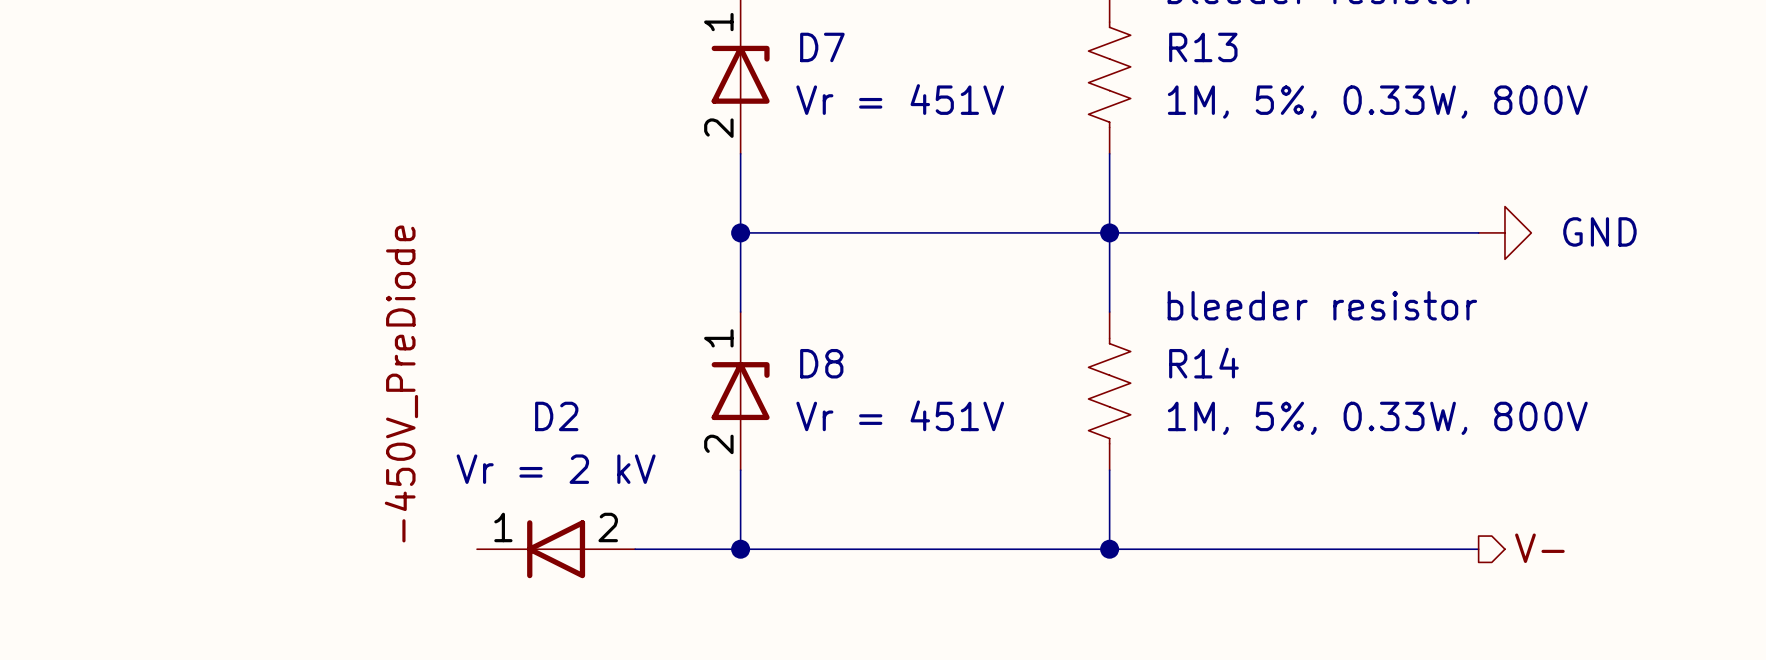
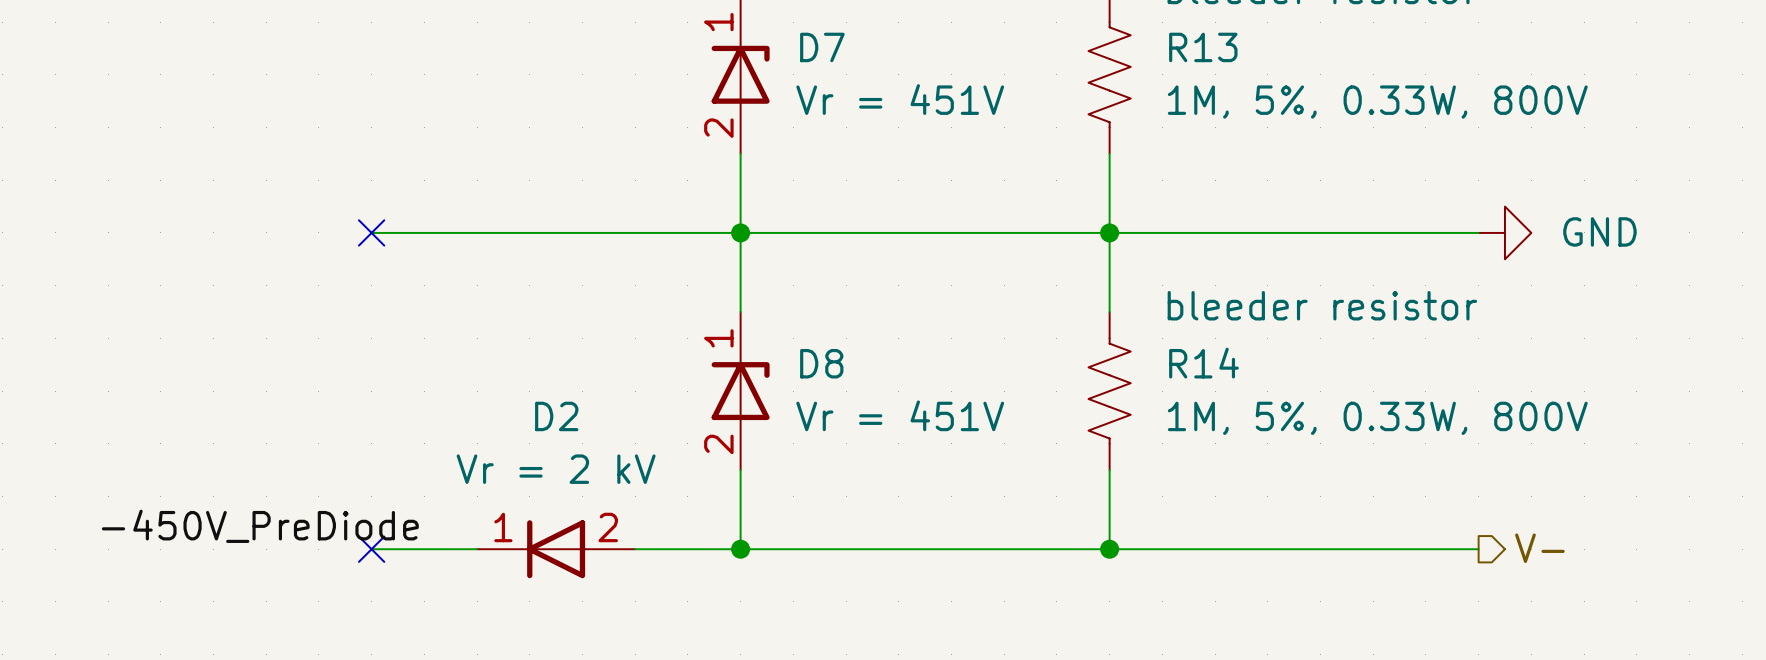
wire: none -> (371, 232) (740, 232)
no-connect mark: none -> (371, 232)
label rotation: 0° (401, 383) -> 90° clockwise (260, 526)
wire: none -> (371, 549) (477, 549)
no-connect mark: none -> (371, 549)

